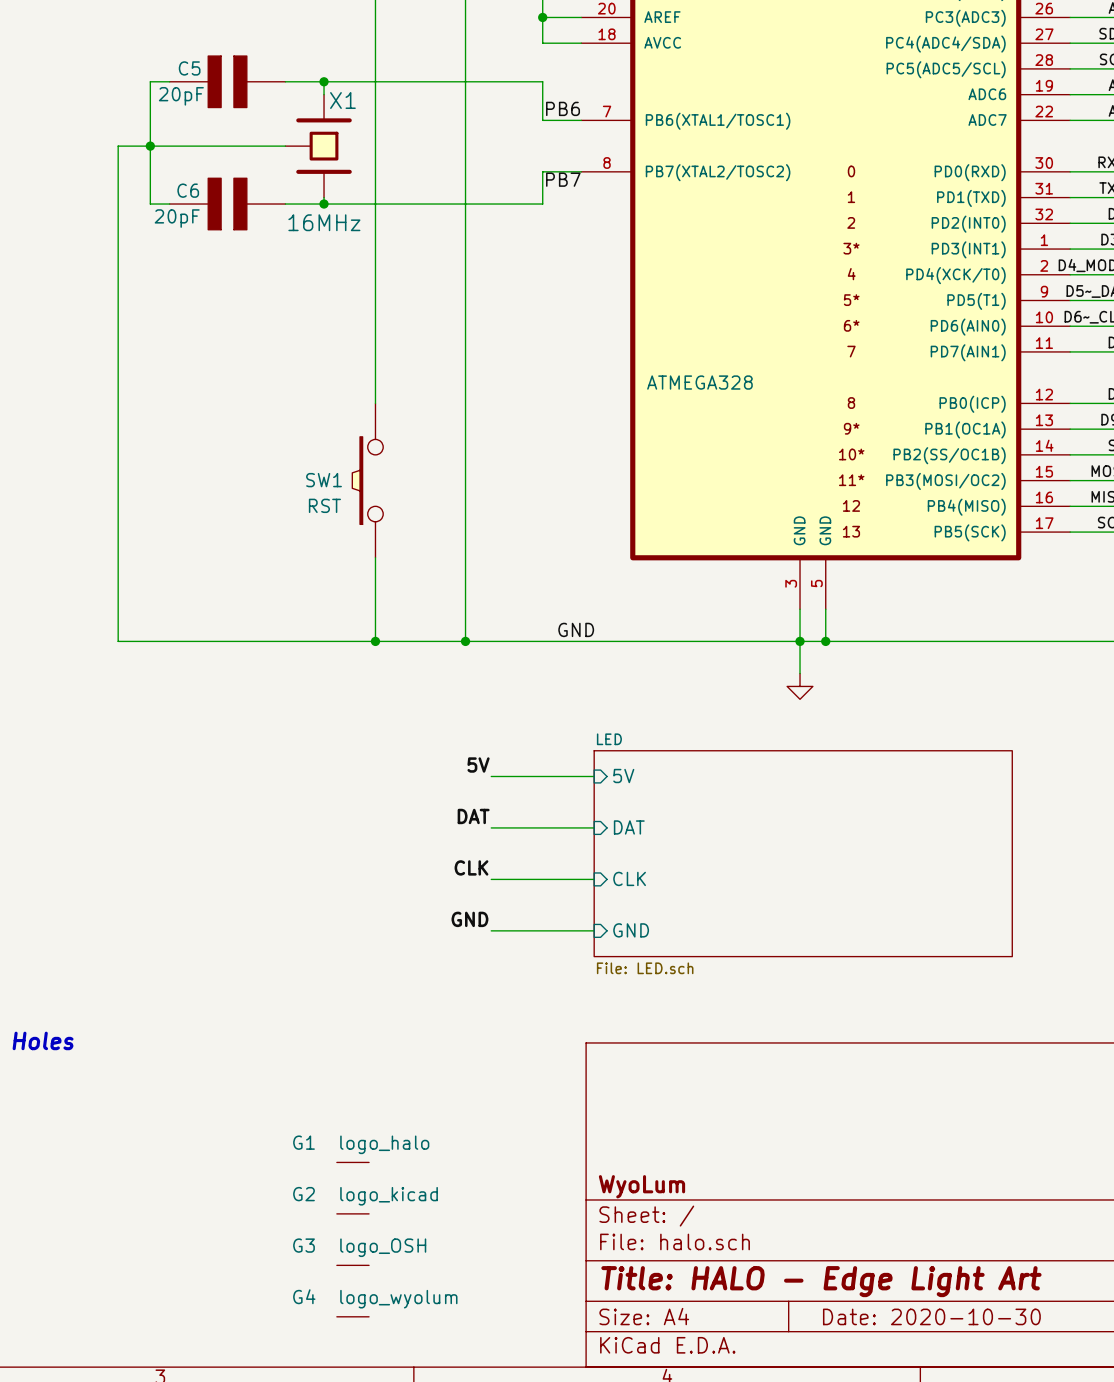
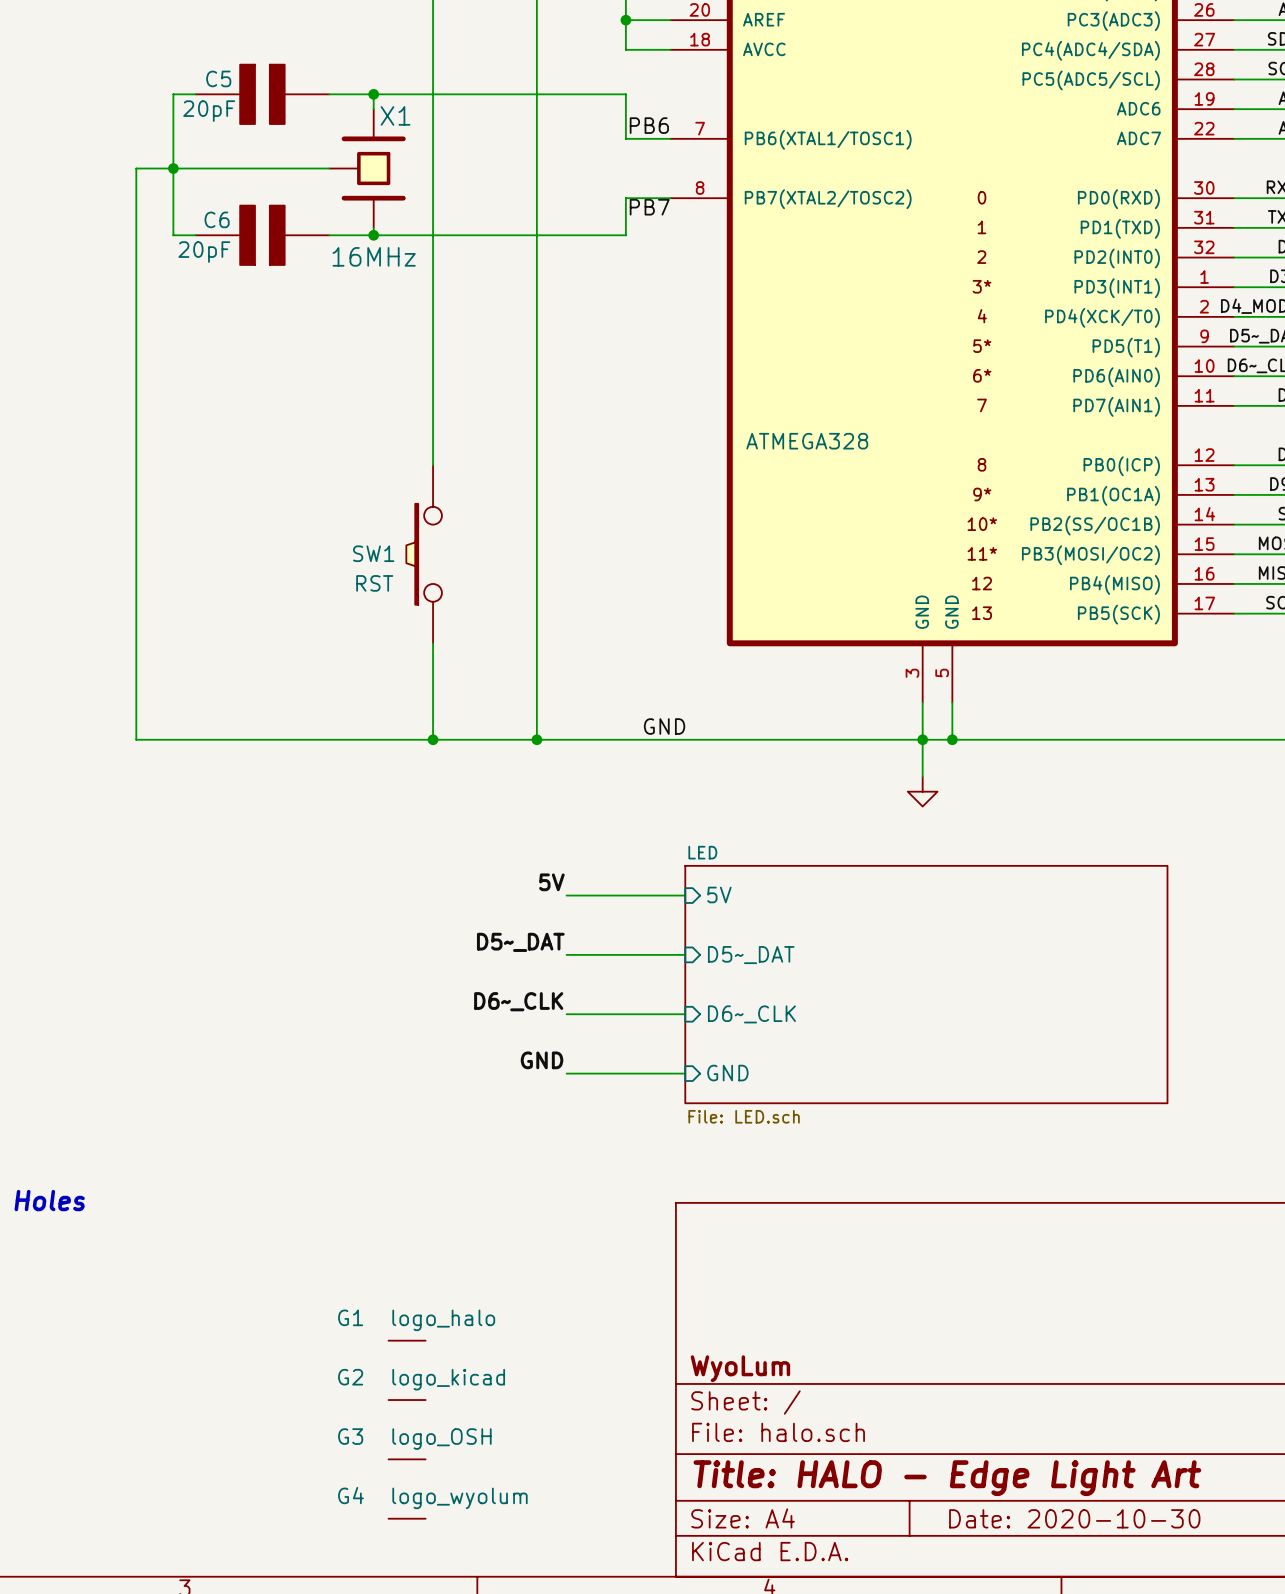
label: DAT (473, 816) -> D5~_DAT (520, 942)
sheet pin: DAT (629, 827) -> D5~_DAT (751, 955)
label: CLK (471, 867) -> D6~_CLK (518, 1001)
sheet pin: CLK (629, 878) -> D6~_CLK (751, 1014)

